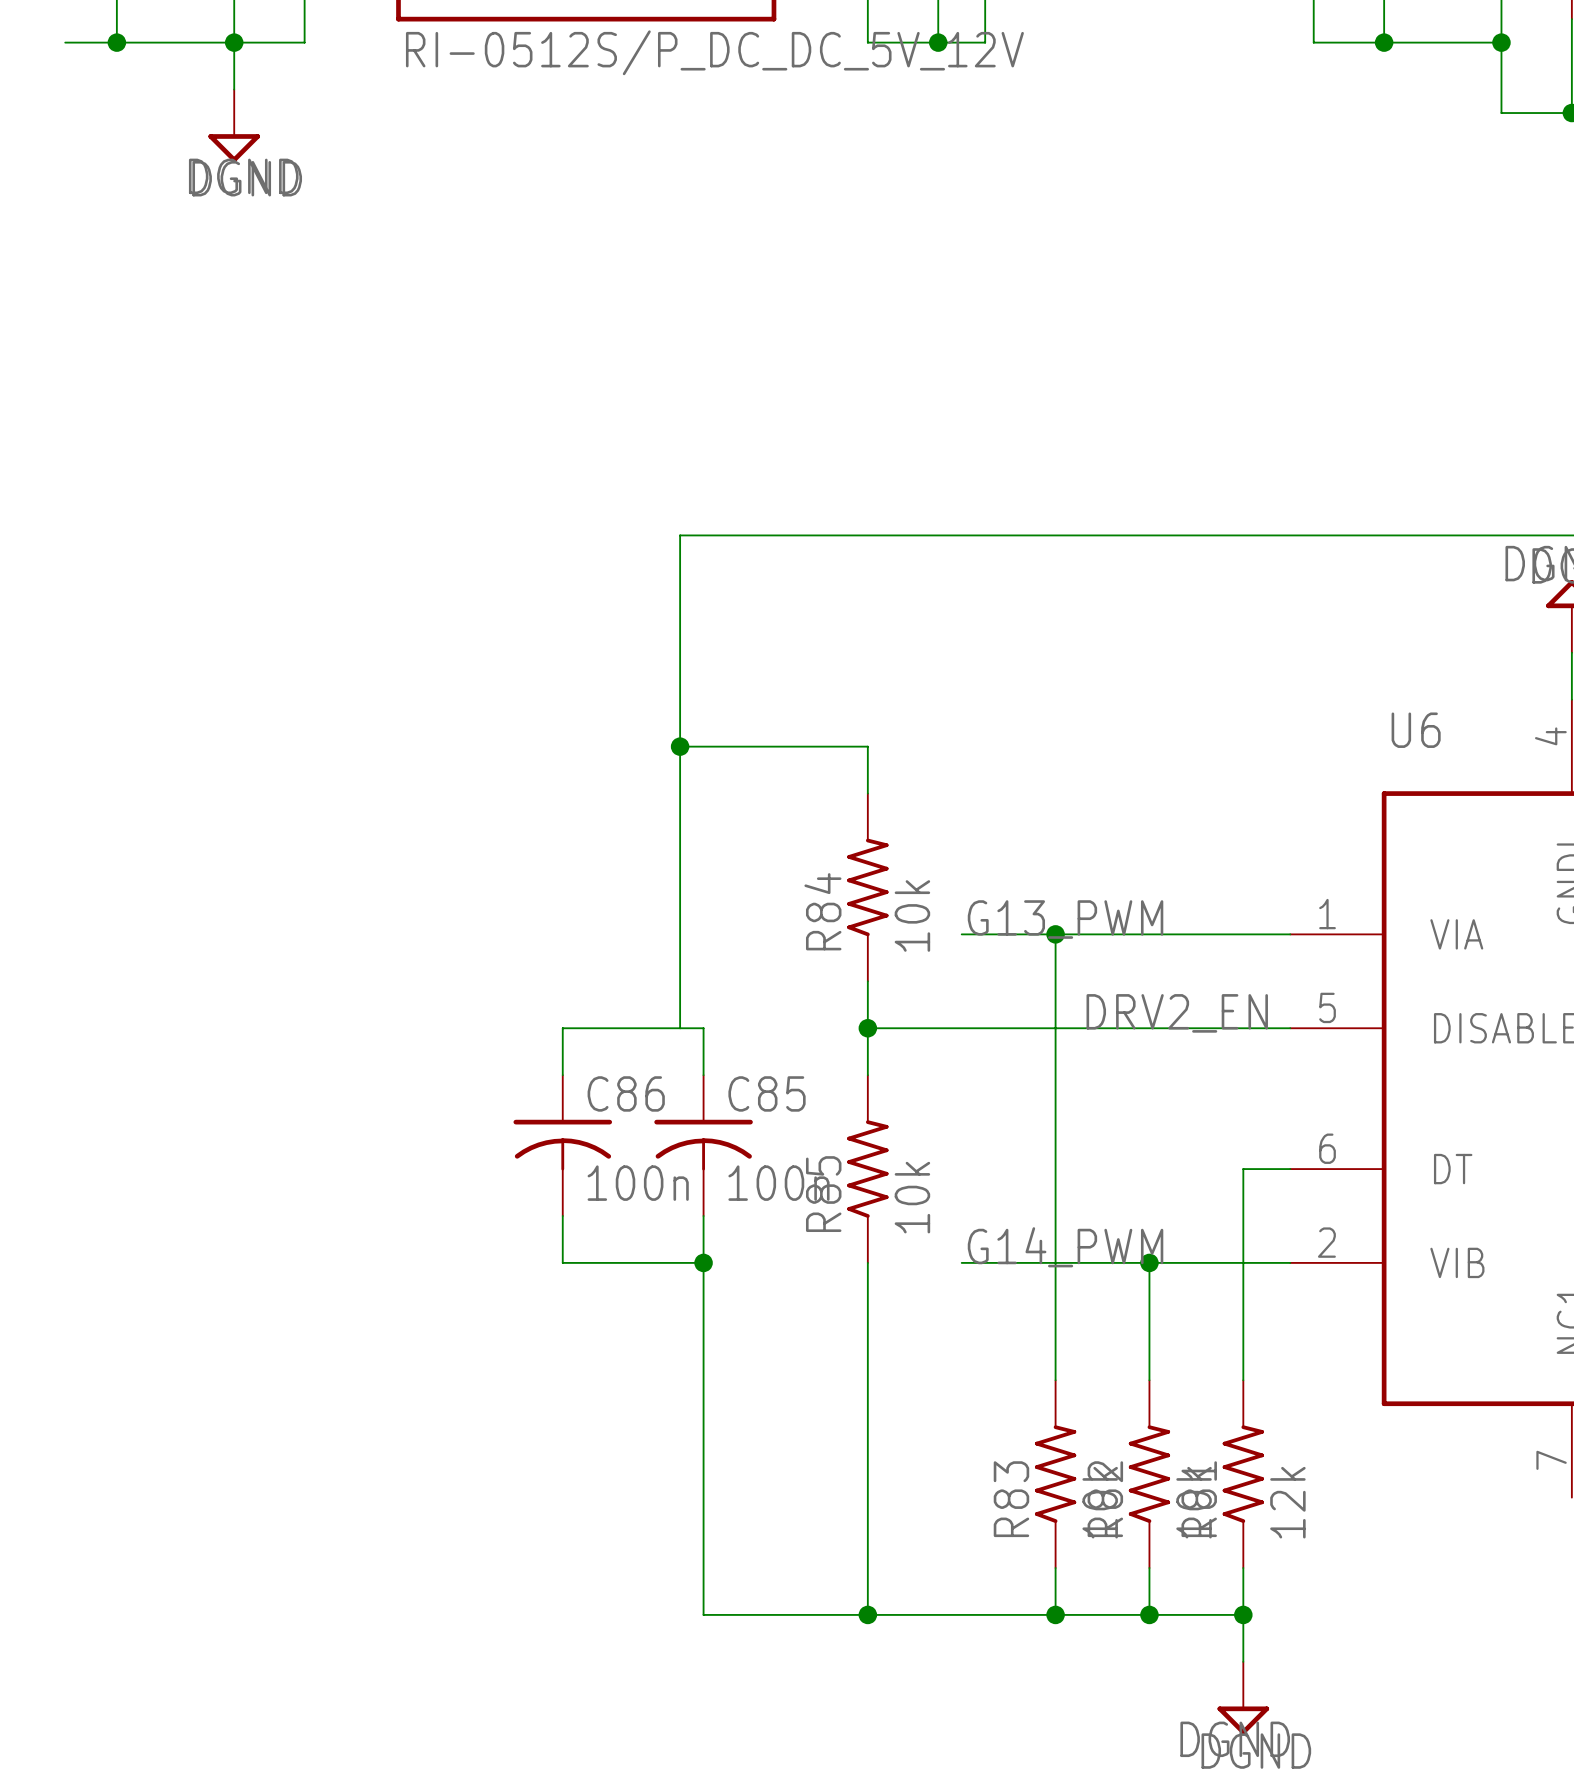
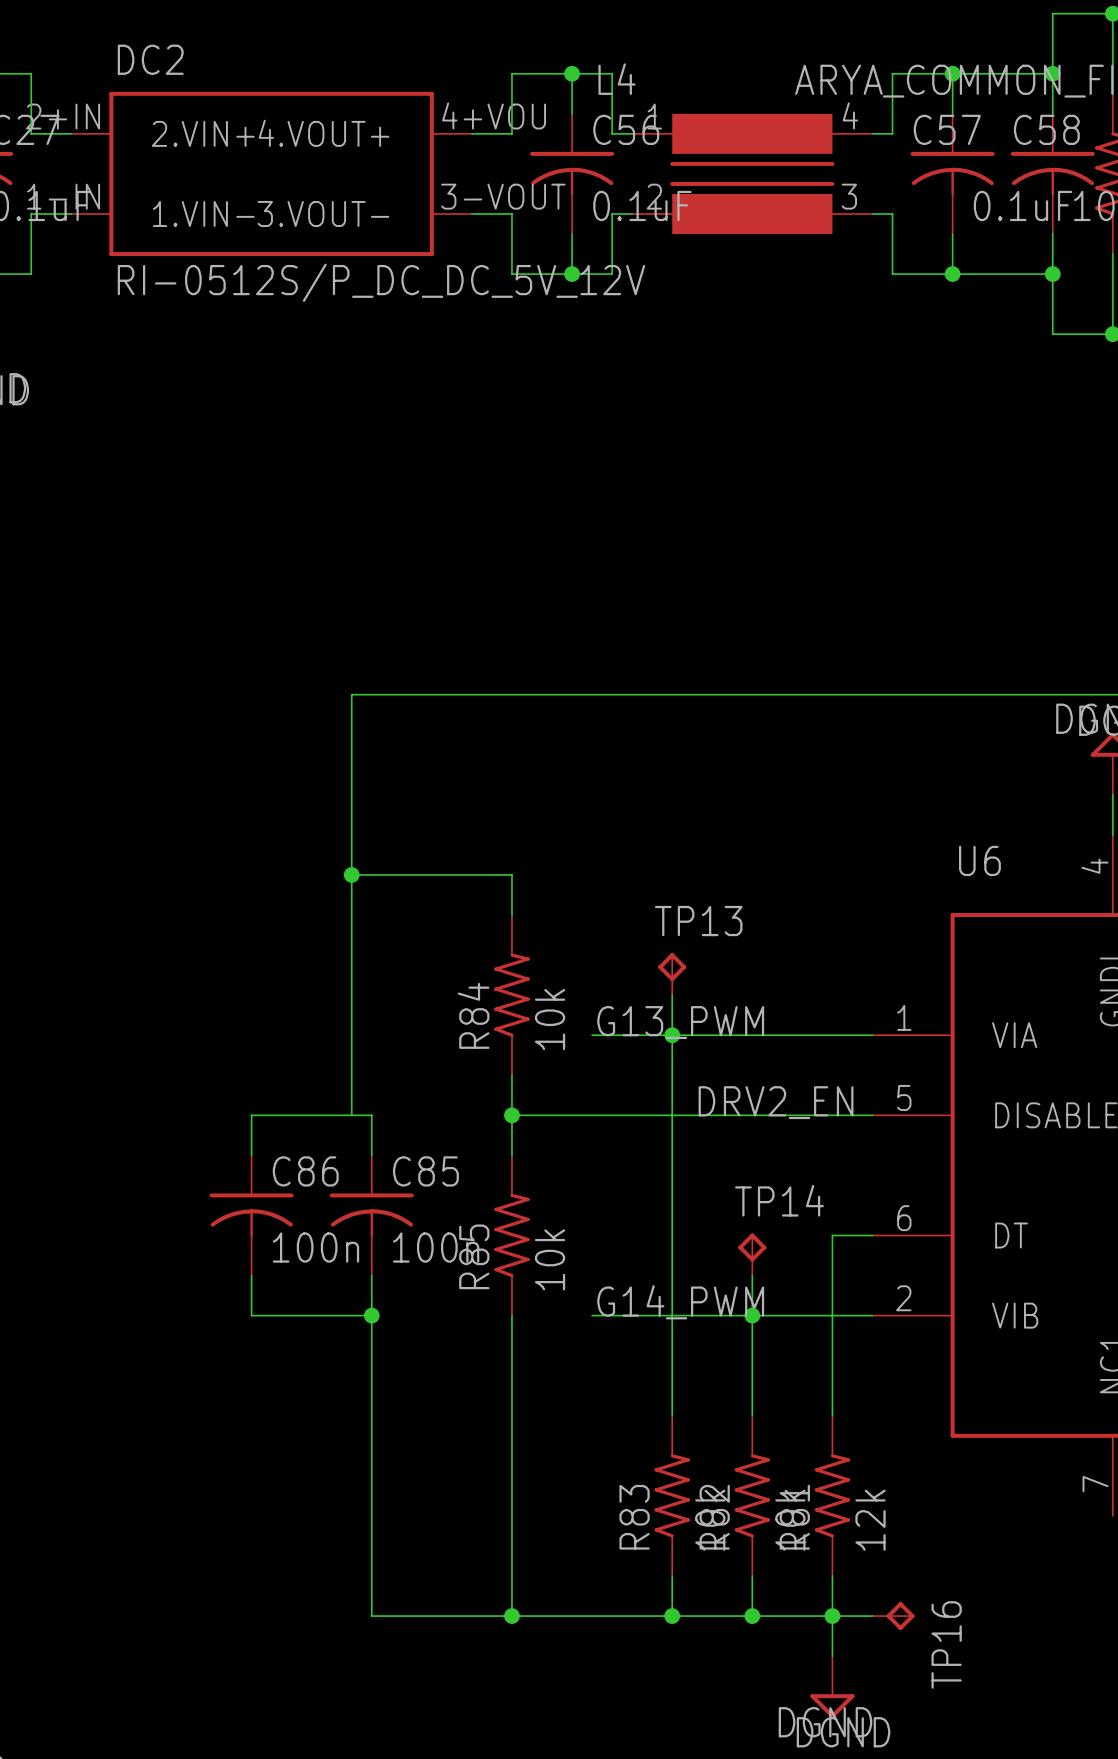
TP13: none -> (672, 974)
wire: none -> (672, 995) (672, 1035)
TP14: none -> (752, 1254)
wire: none -> (752, 1275) (752, 1315)
wire: none -> (832, 1616) (872, 1616)
TP16: none -> (893, 1616)

